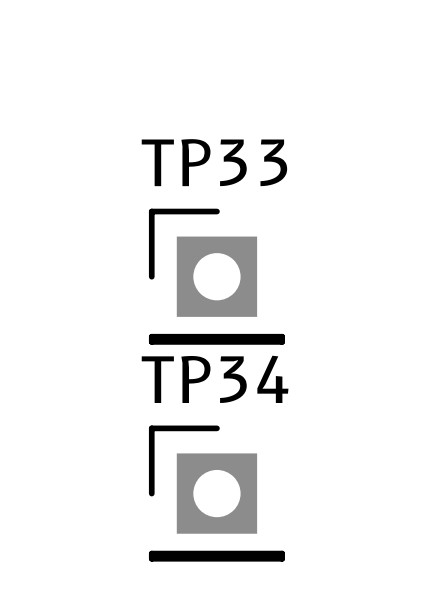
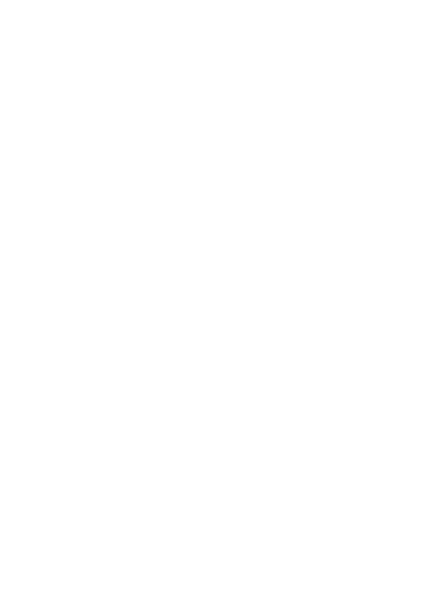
TP33: (216, 276) -> none
TP34: (216, 493) -> none

